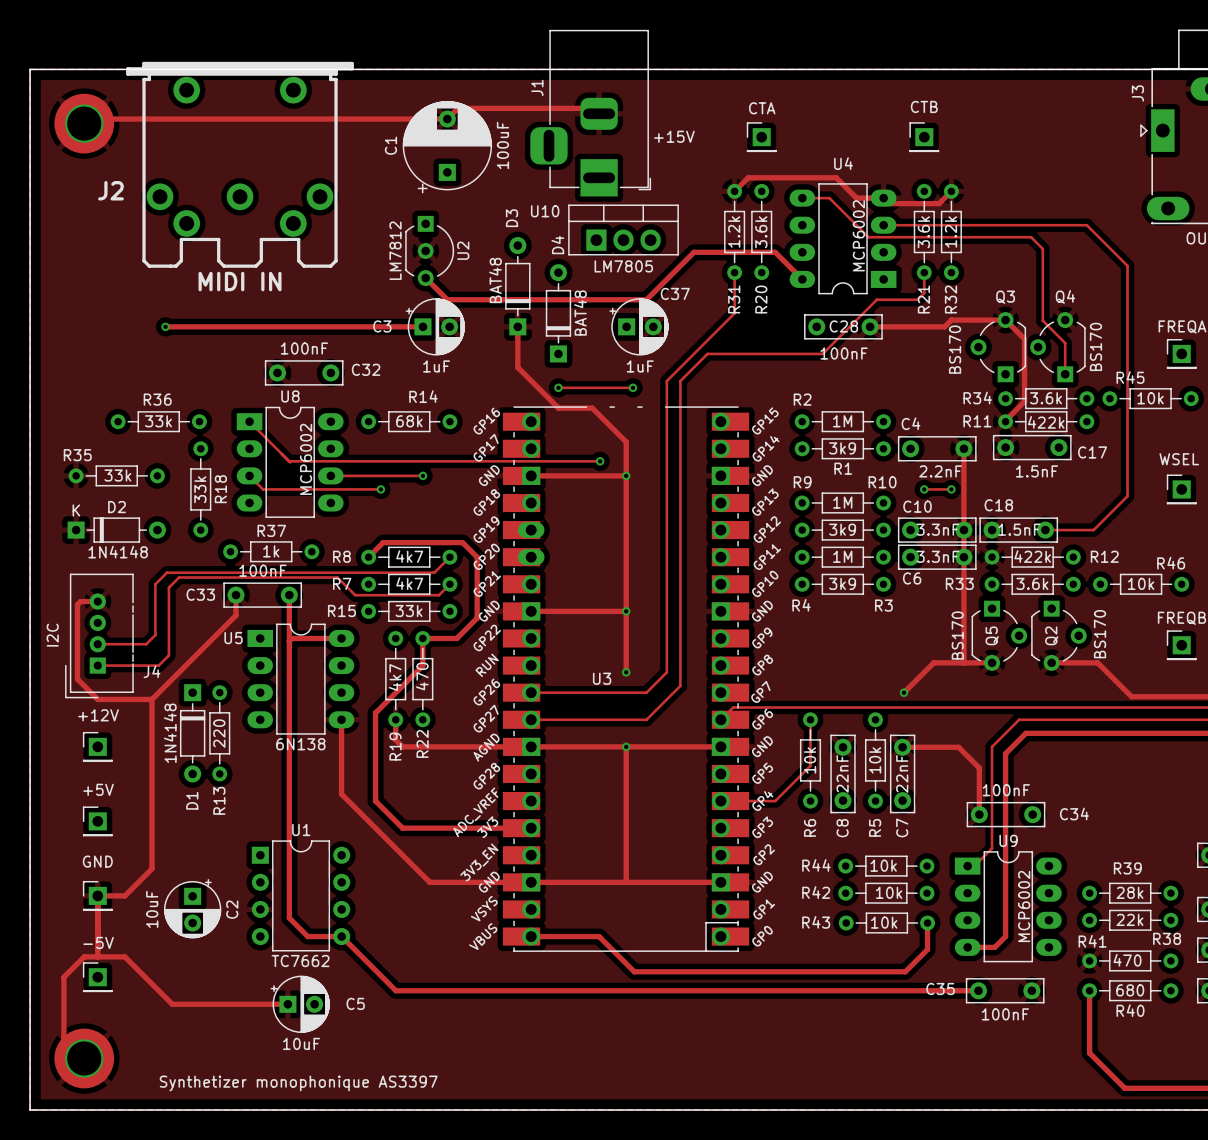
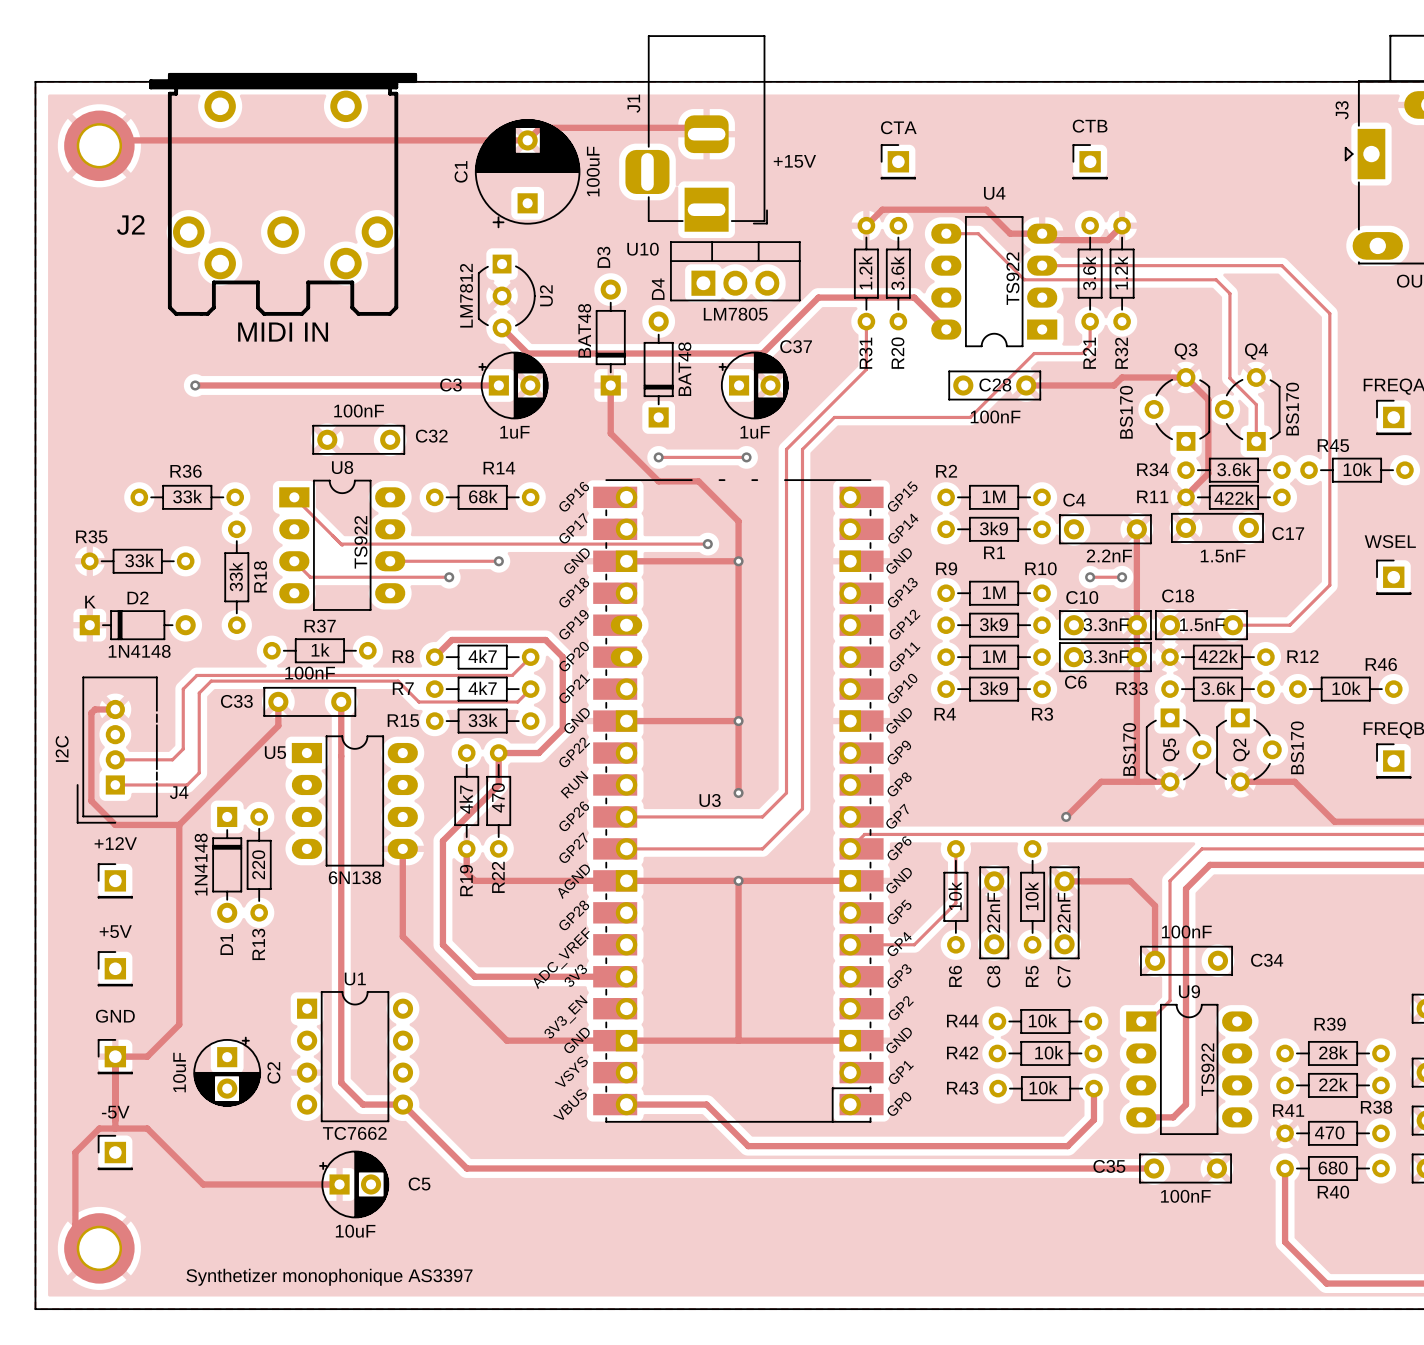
U4 value: MCP6002 (858, 235) -> TS922 (1012, 278)
U8 value: MCP6002 (306, 459) -> TS922 (360, 542)
track: (341, 638) (292, 638) (289, 641) -> none
U9 value: MCP6002 (1024, 906) -> TS922 (1207, 1069)

